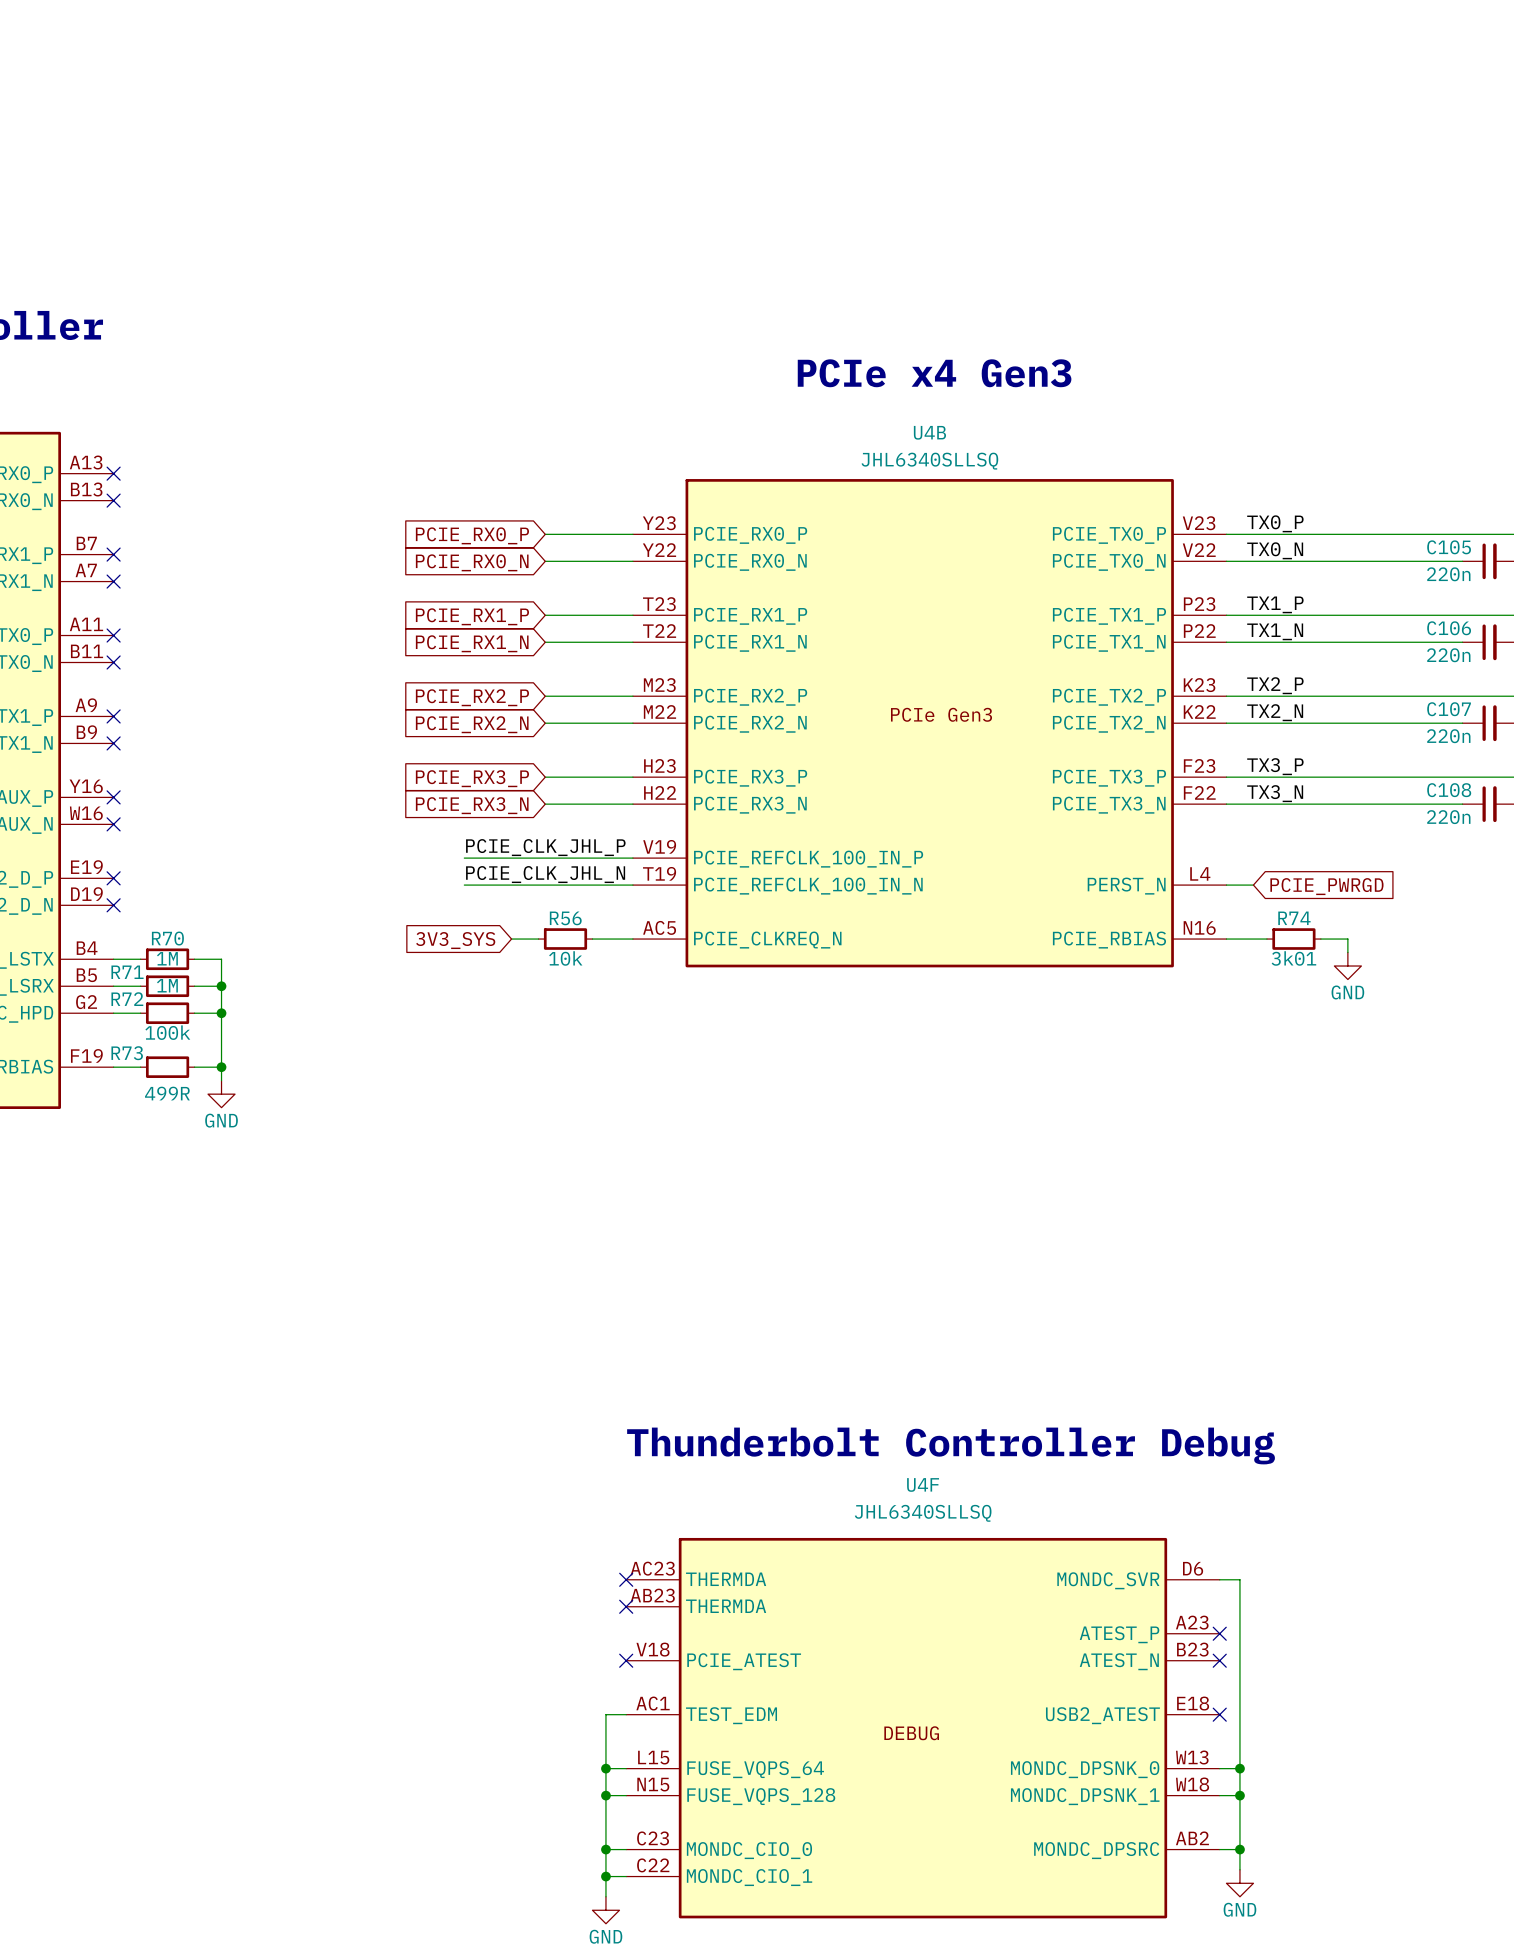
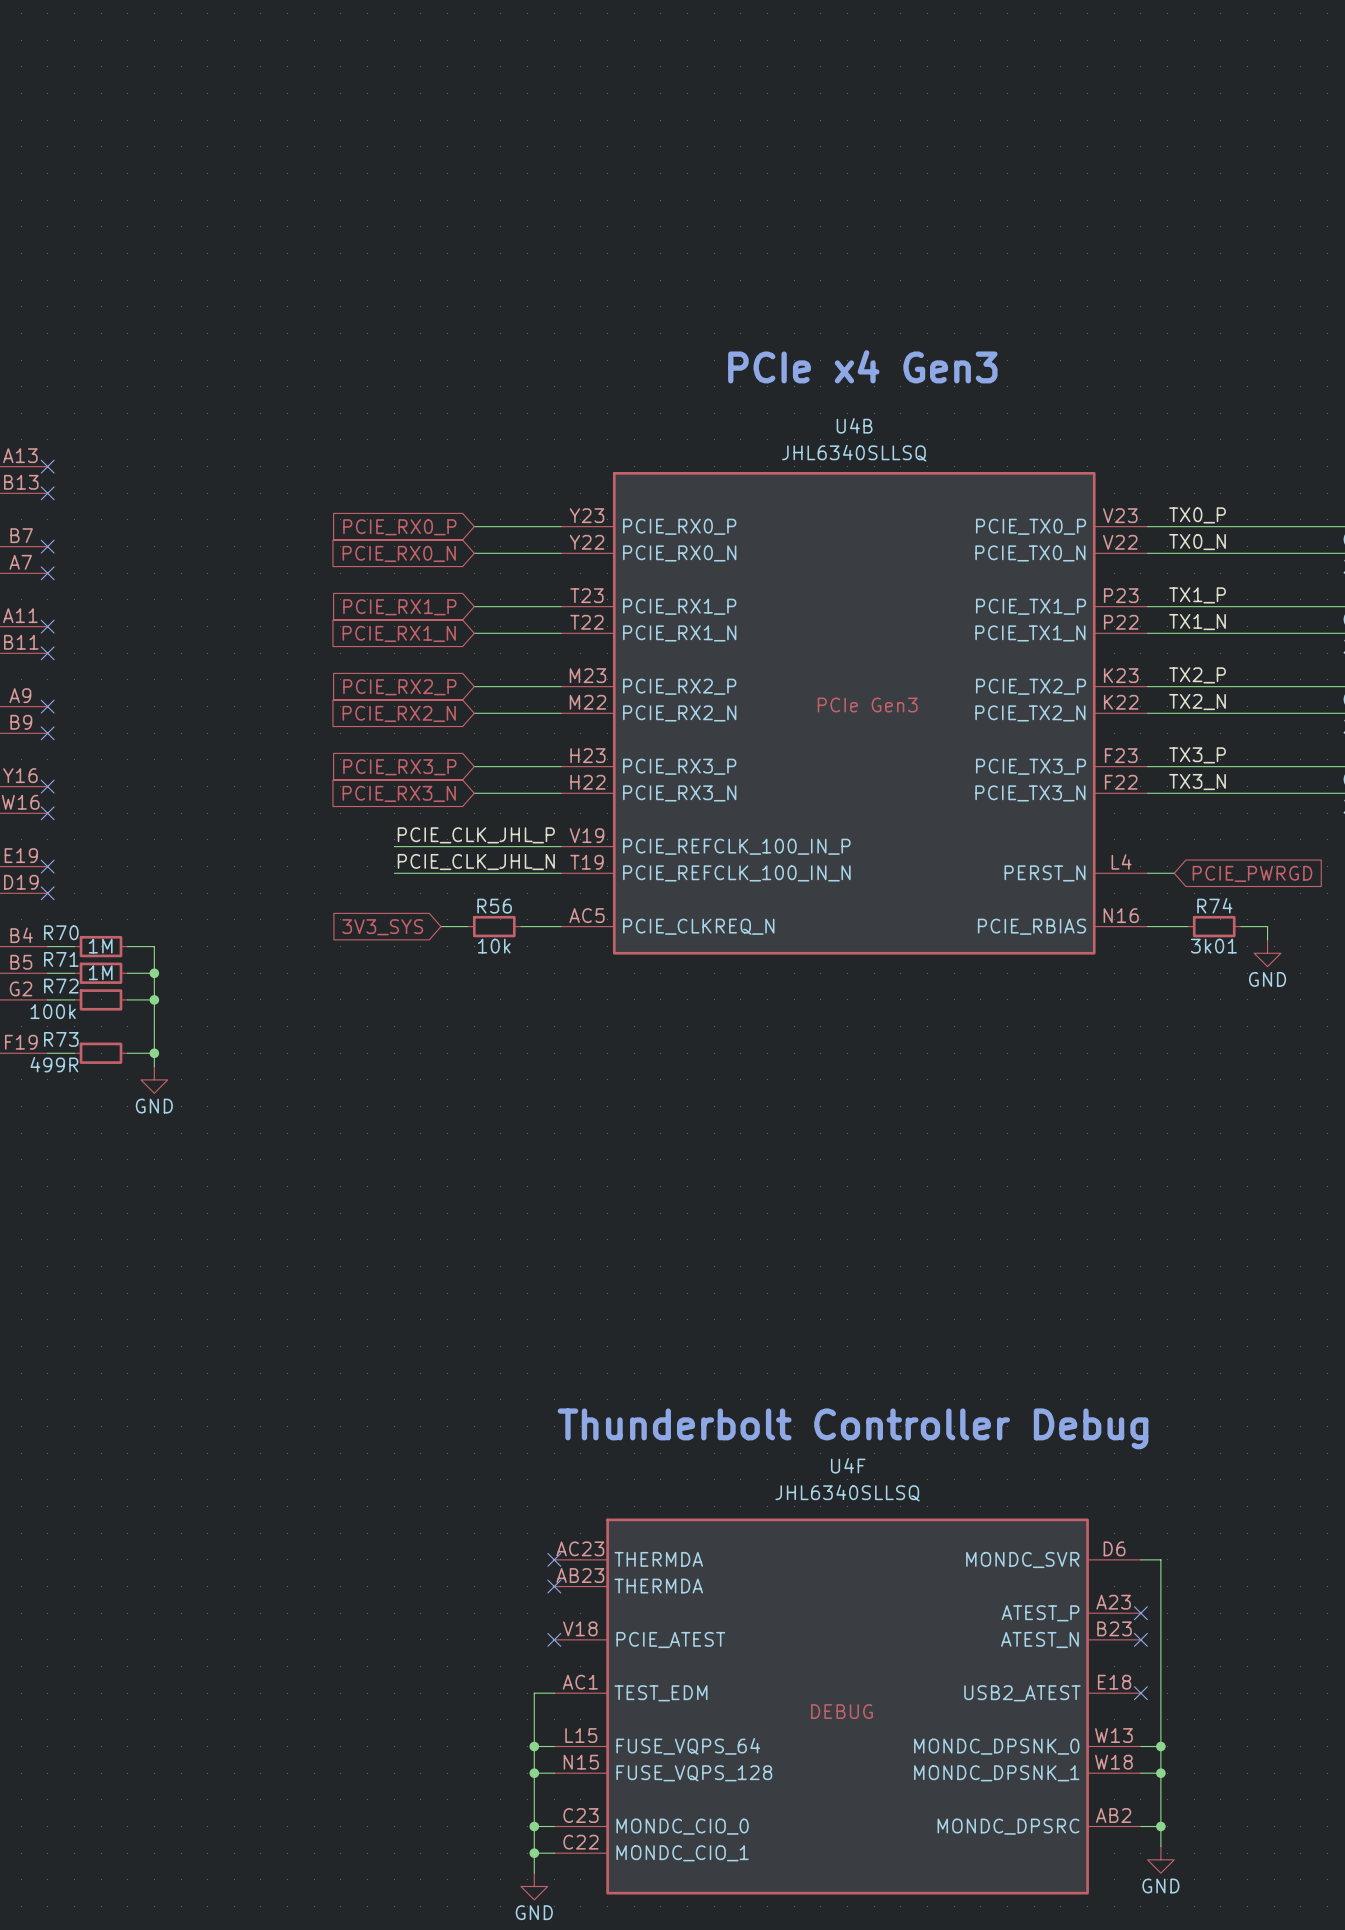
R70 name position: R70 (167, 938) -> R70 (61, 932)
R72 text position: 100k (167, 1032) -> 100k (53, 1011)
R73 text position: 499R (167, 1093) -> 499R (54, 1064)

